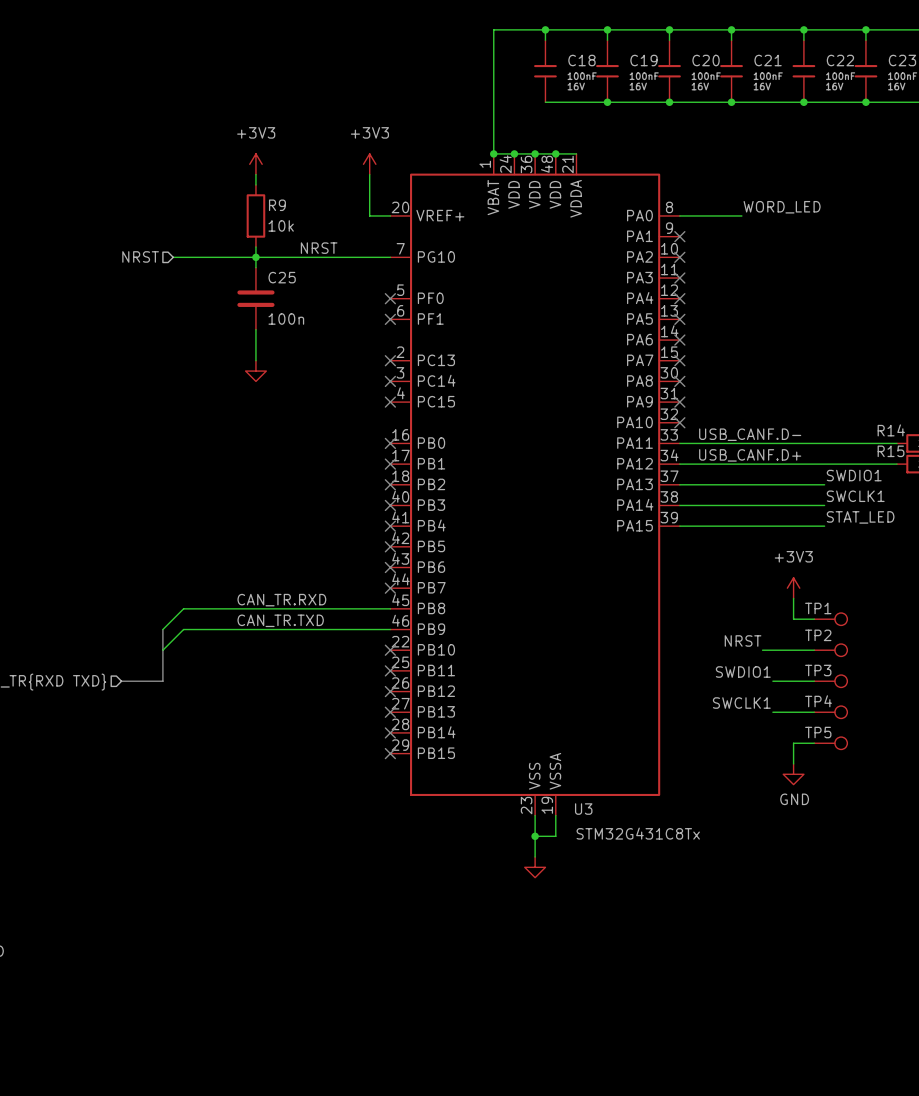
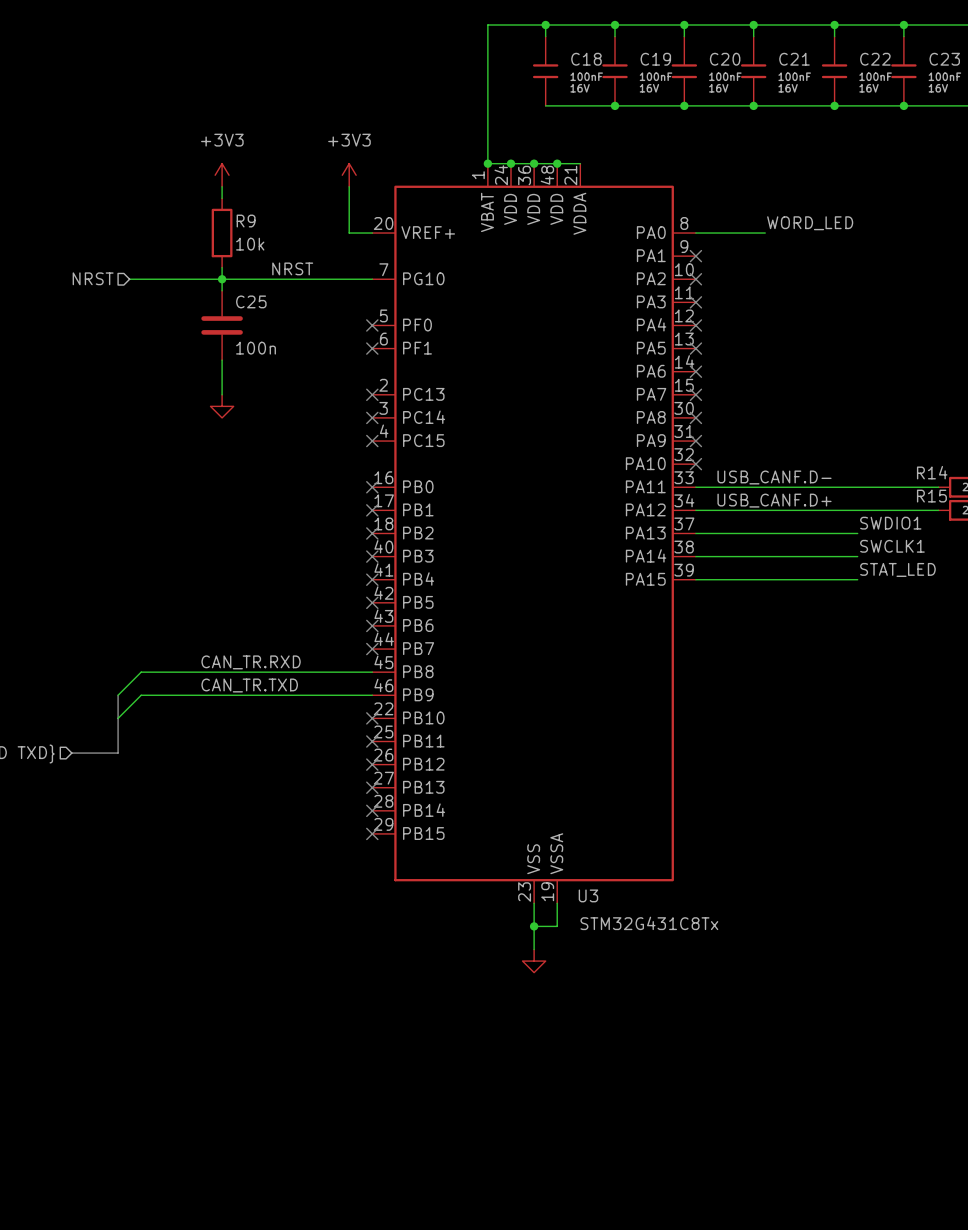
power symbol: +3V3 (793, 588) -> none
wire: (793, 598) (793, 619) (814, 619) -> none
TP1: (830, 619) -> none
label: NRST (743, 640) -> none
wire: (762, 650) (814, 650) -> none
TP2: (830, 650) -> none
label: SWDIO1 (743, 672) -> none
wire: (772, 681) (814, 681) -> none
TP3: (830, 681) -> none
label: SWCLK1 (741, 703) -> none
wire: (772, 712) (814, 712) -> none
TP4: (830, 712) -> none
wire: (814, 743) (793, 743) (793, 763) -> none
TP5: (830, 743) -> none
power symbol: GND (793, 774) -> none

